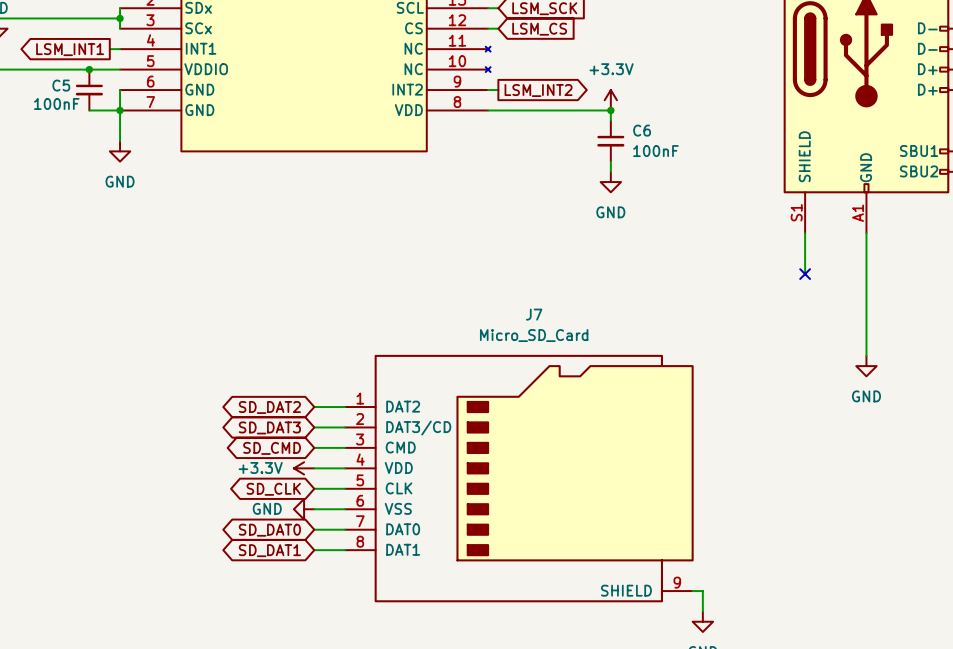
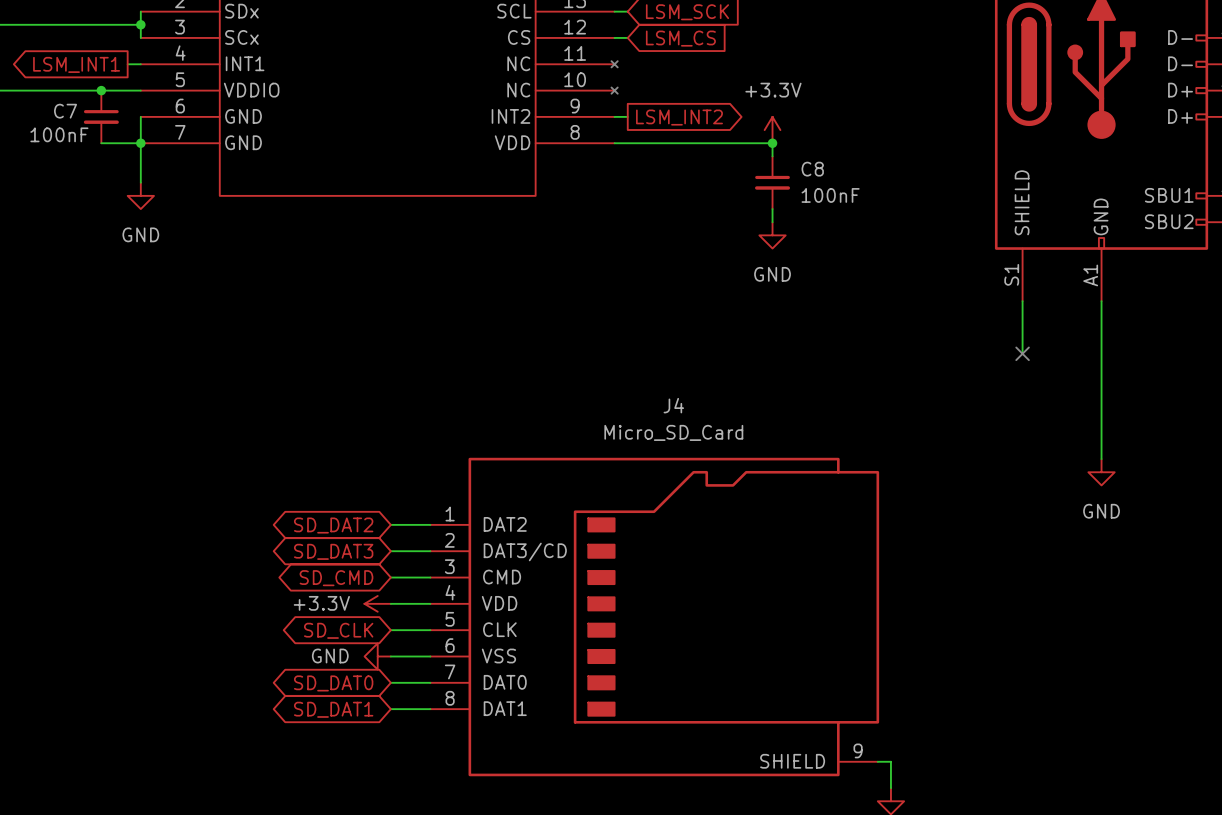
C5 name: C5 (61, 85) -> C7 (65, 111)
C6 name: C6 (642, 130) -> C8 (812, 169)
J7 name: J7 (534, 314) -> J4 (673, 405)

